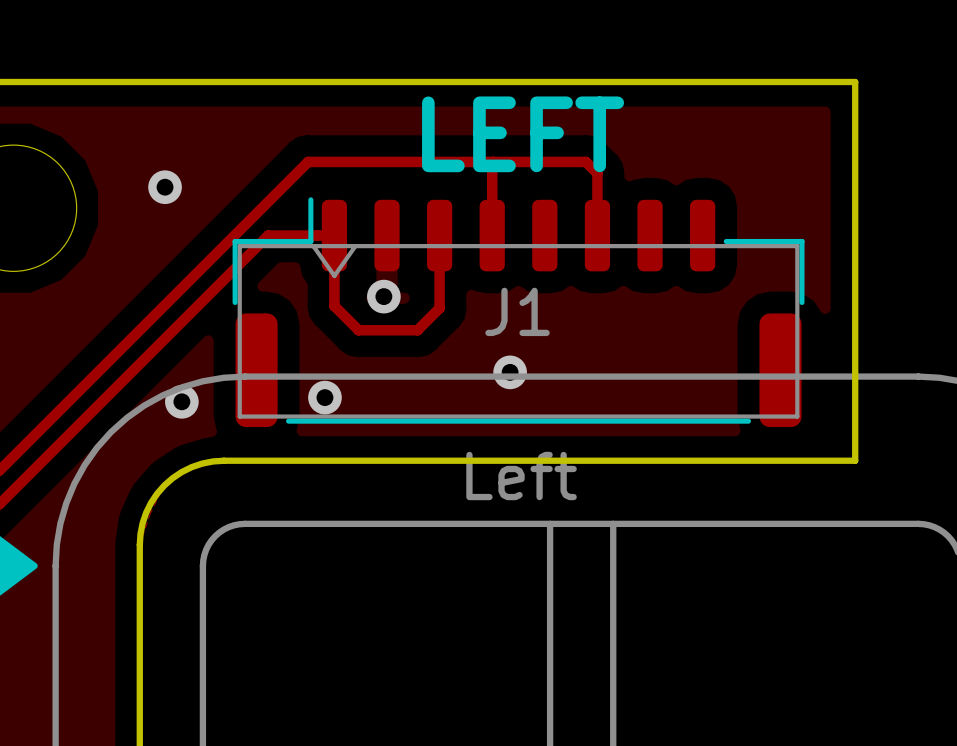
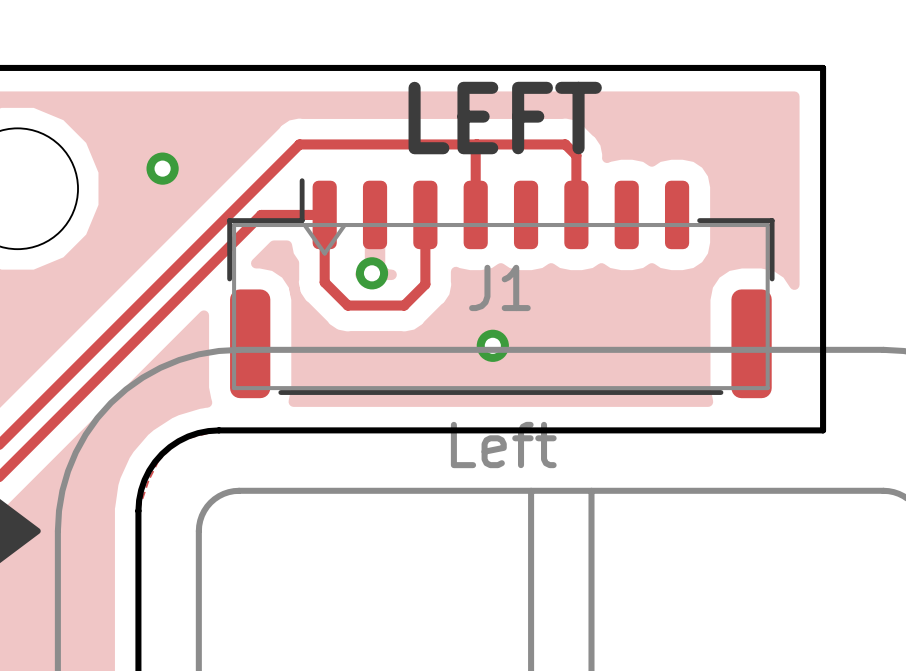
via: (324, 397) -> none
via: (181, 401) -> none

